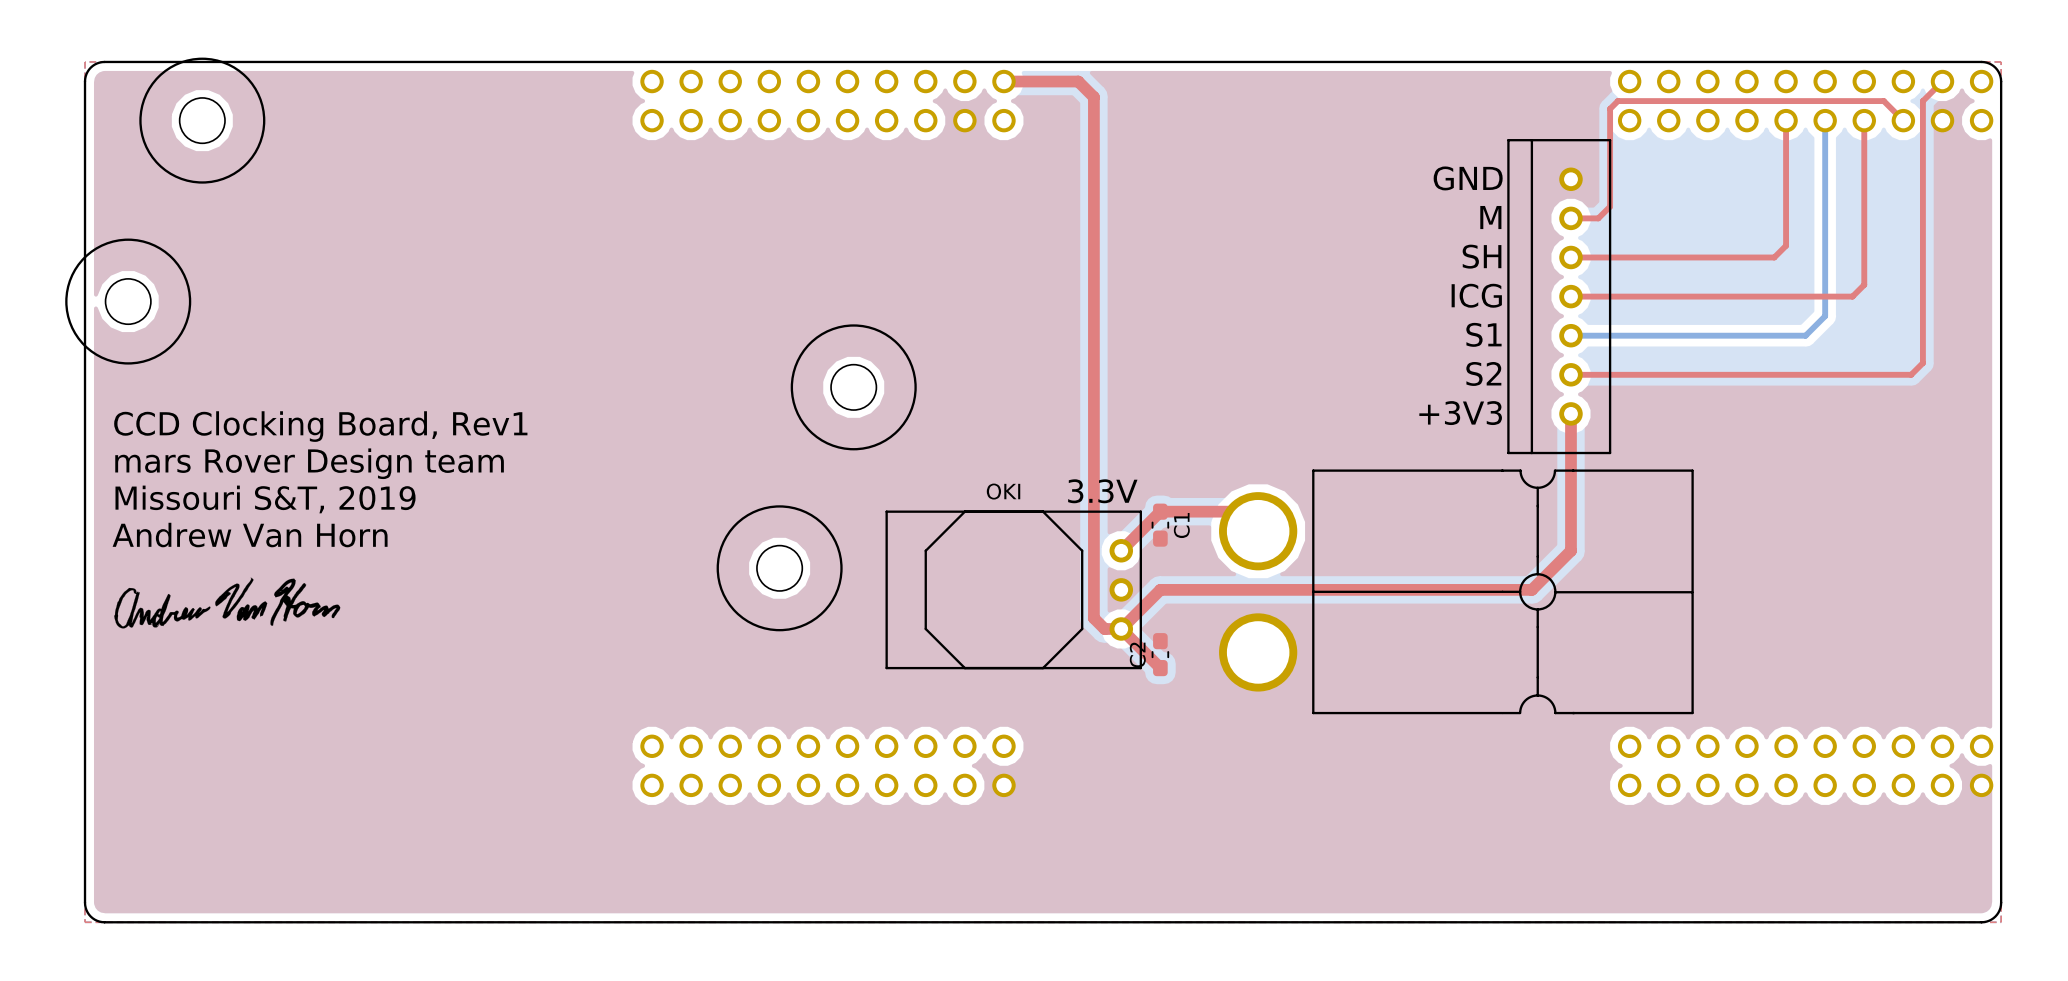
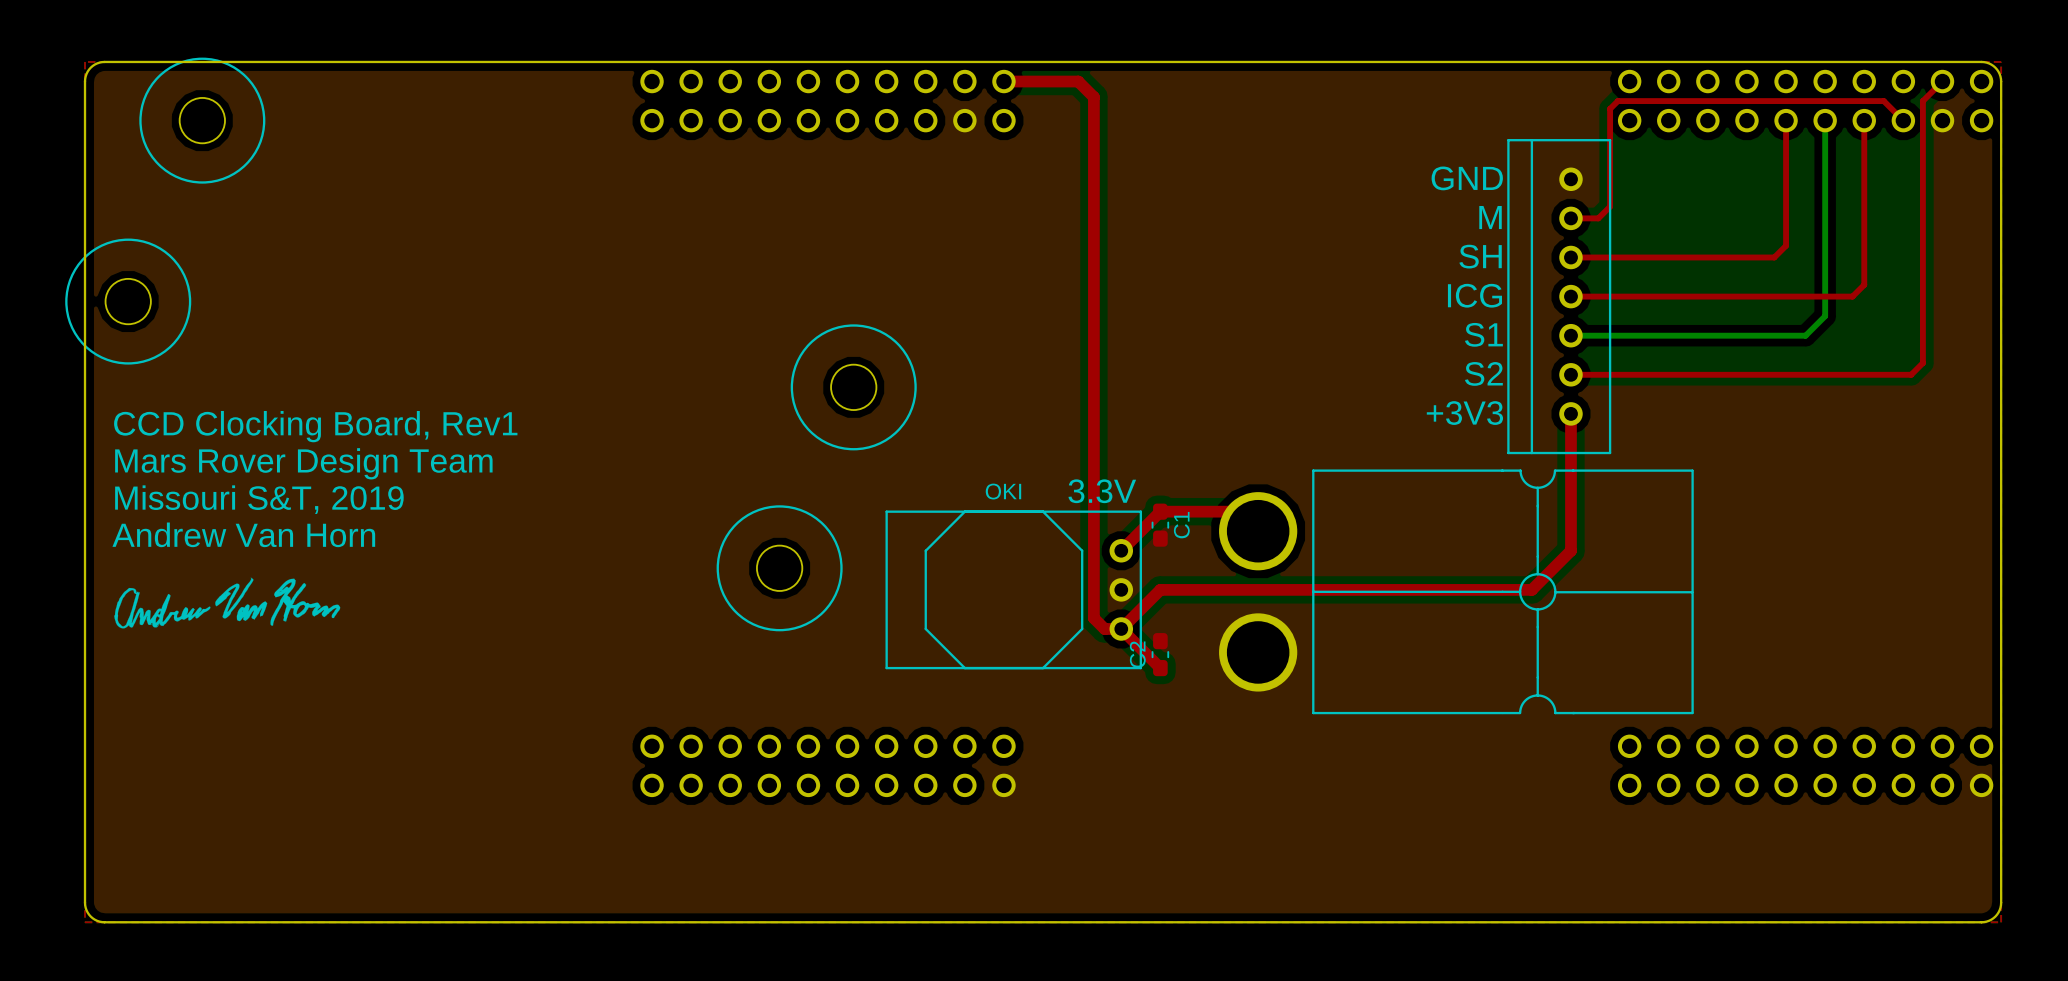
text: mars Rover Design team (309, 463) -> Mars Rover Design Team (303, 463)

